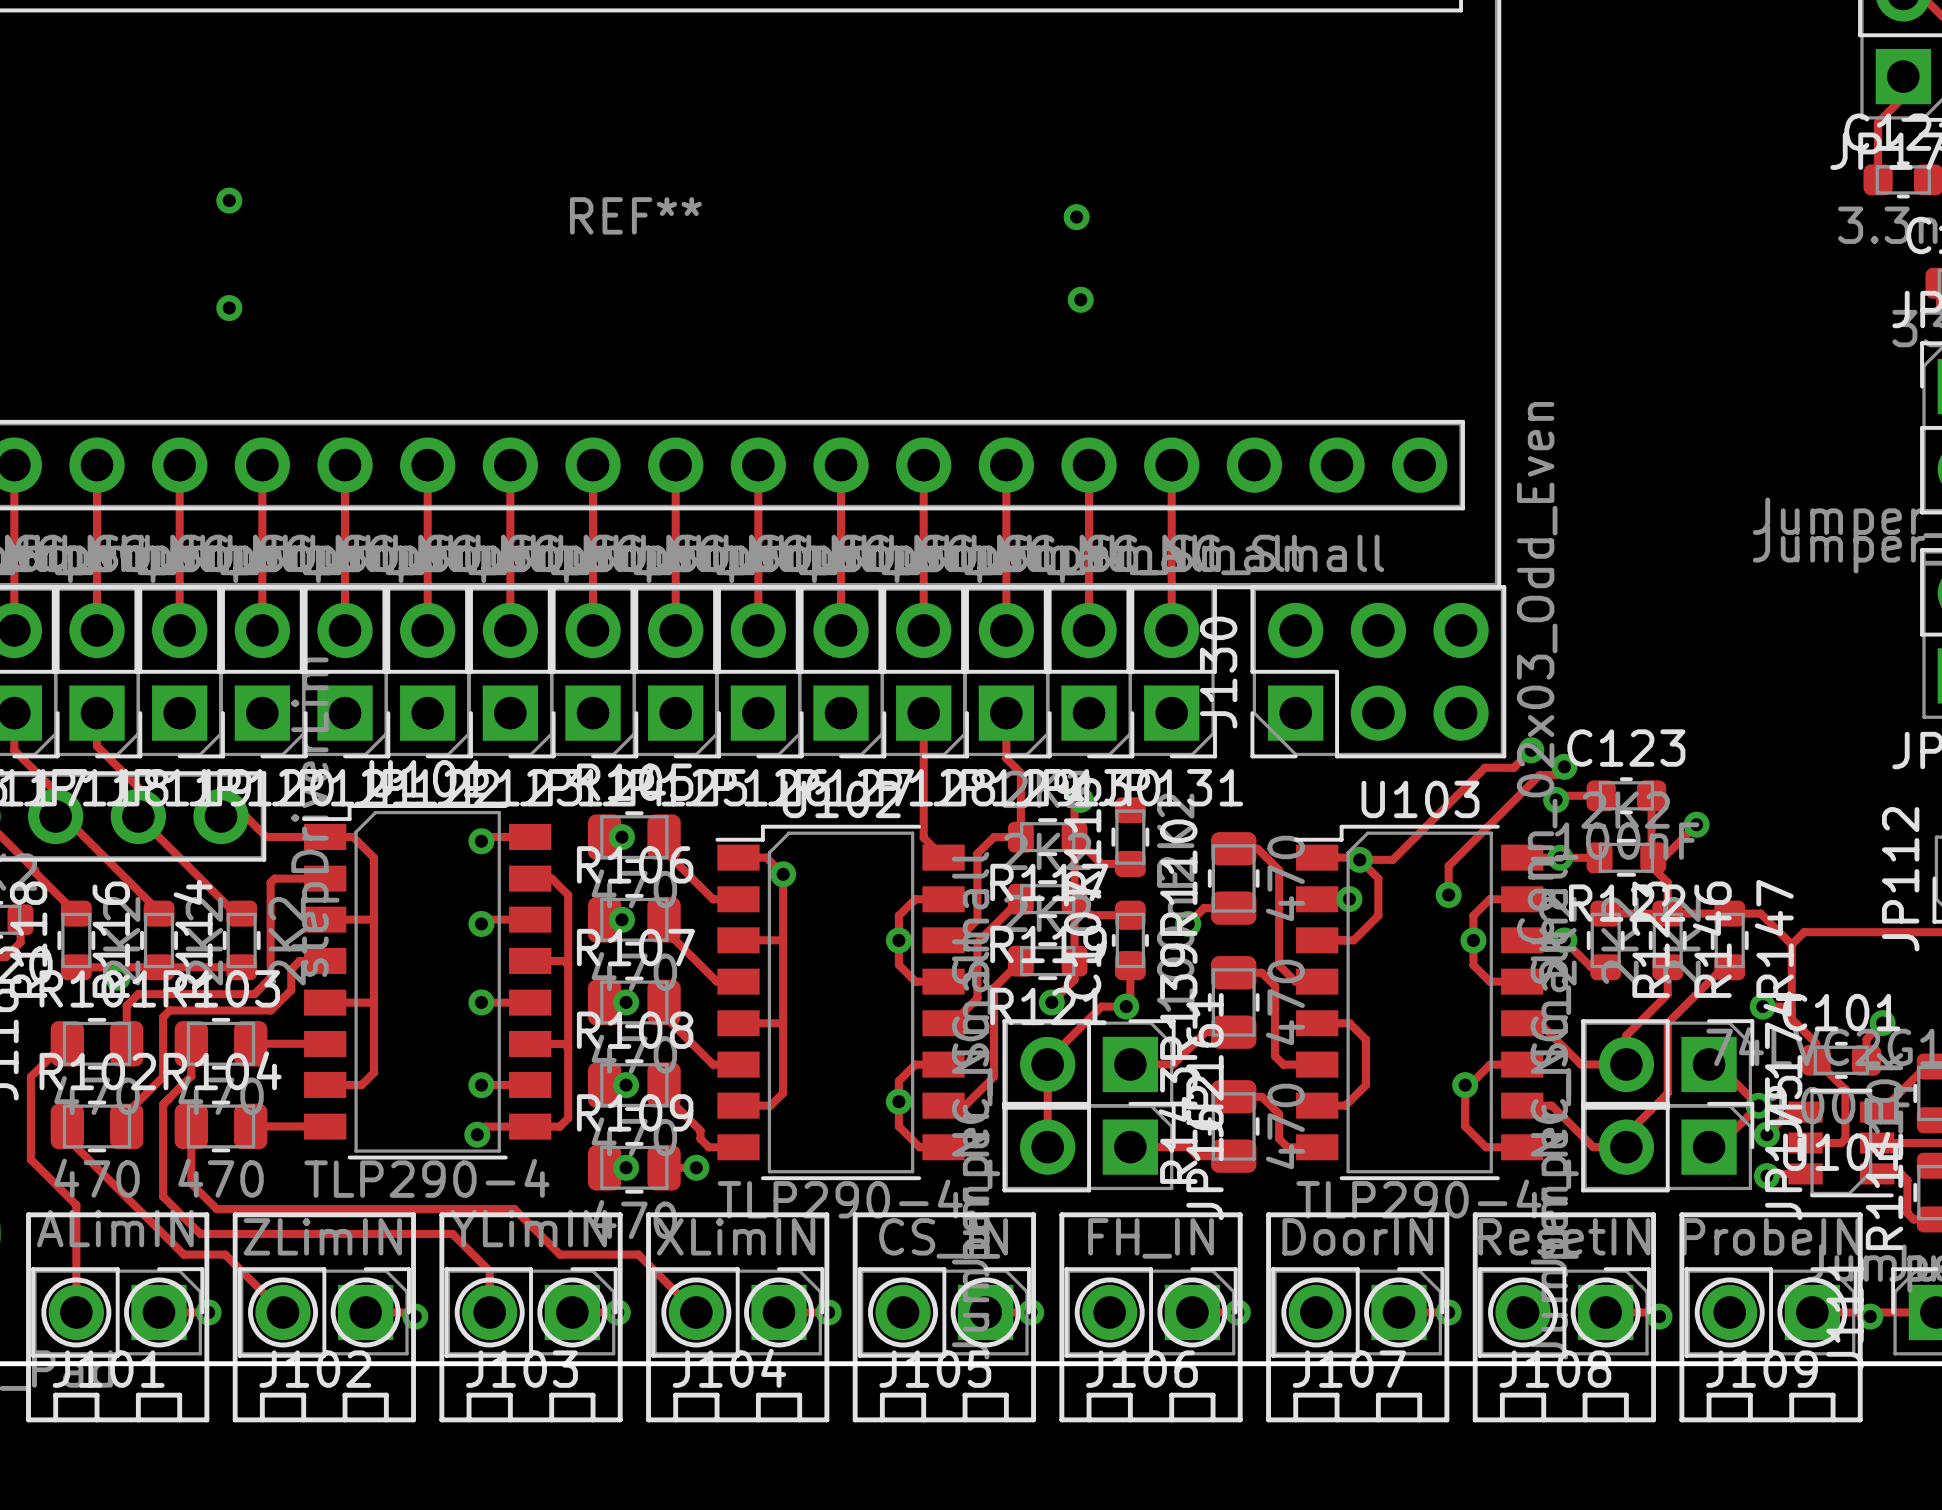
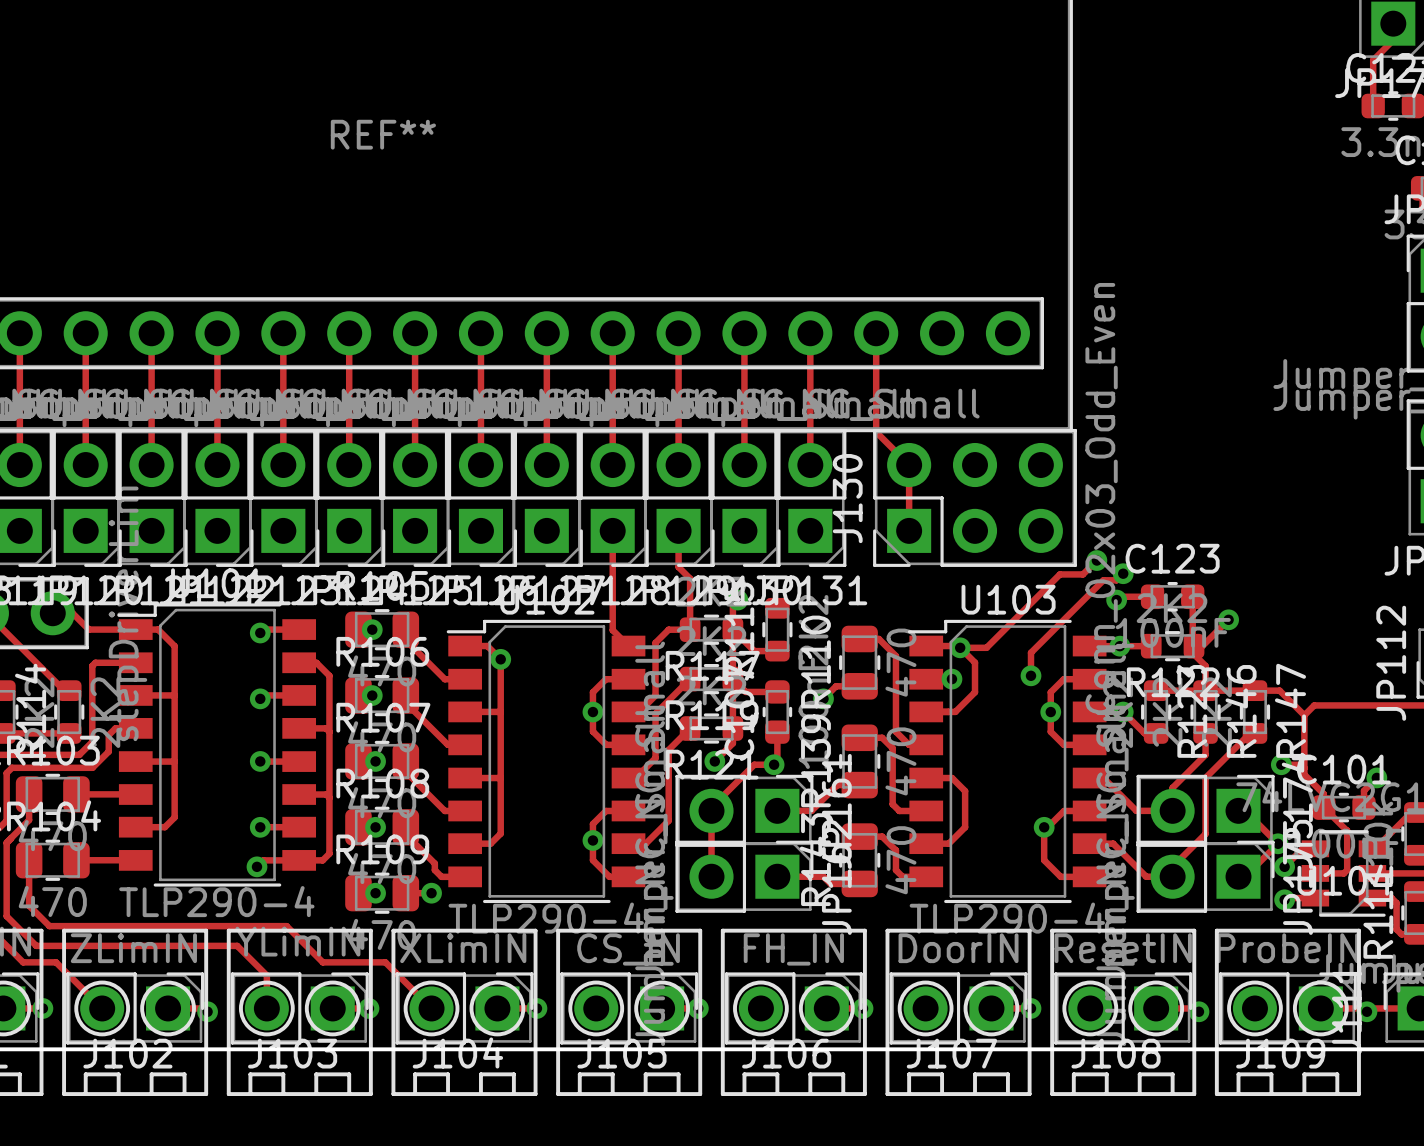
via: (229, 200) -> none
via: (1076, 217) -> none
via: (1080, 299) -> none
via: (229, 308) -> none
track: none -> (876, 333) (876, 432) (909, 465) (909, 530)

